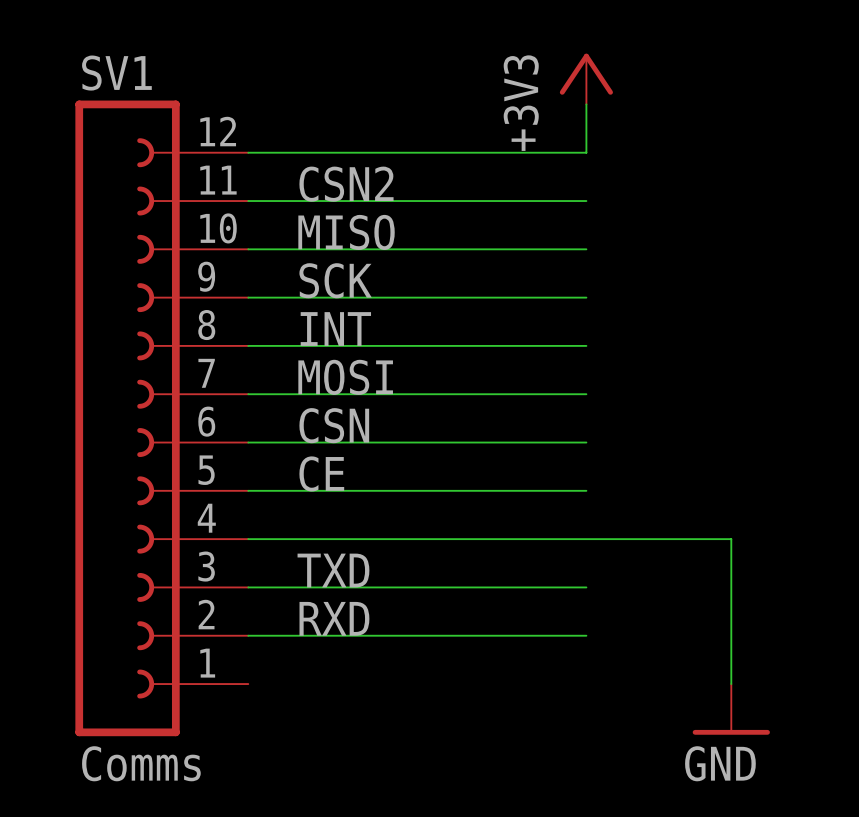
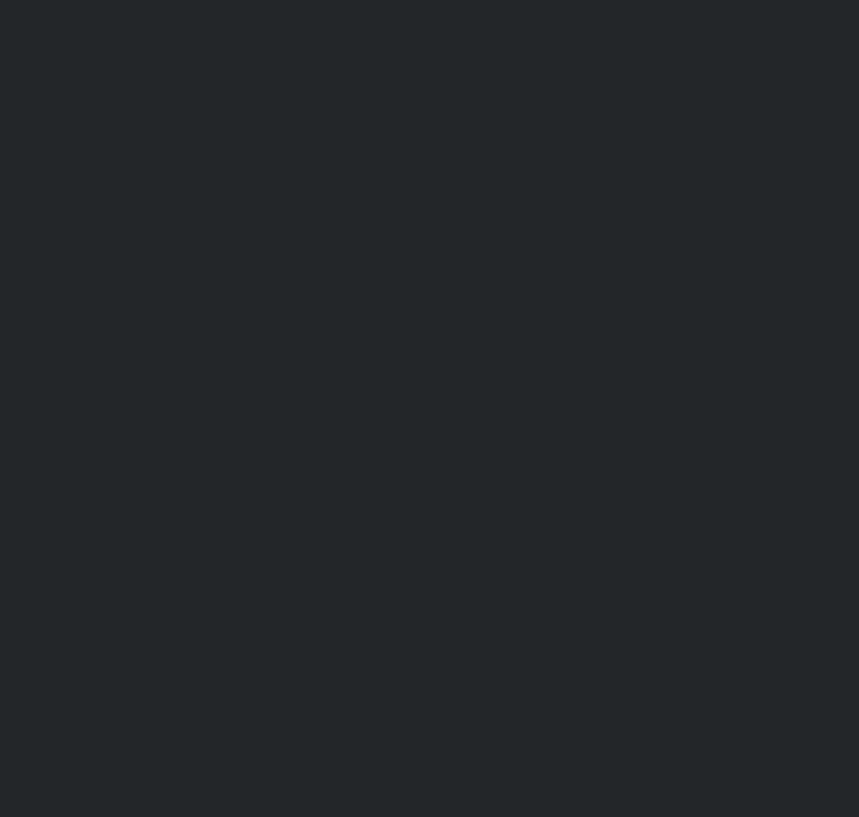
power symbol: +3V3 (586, 79) -> none
wire: (586, 104) (586, 152) (248, 152) -> none
label: CSN2 (346, 184) -> none
wire: (248, 201) (586, 201) -> none
label: MISO (346, 232) -> none
wire: (248, 249) (586, 249) -> none
label: SCK (335, 280) -> none
wire: (248, 297) (586, 297) -> none
label: INT (335, 329) -> none
wire: (248, 345) (586, 345) -> none
label: MOSI (345, 377) -> none
wire: (248, 394) (586, 394) -> none
SV1: Comms (161, 418) -> none
label: CSN (334, 425) -> none
wire: (248, 442) (586, 442) -> none
label: CE (321, 473) -> none
wire: (248, 490) (586, 490) -> none
wire: (248, 539) (731, 539) (731, 684) -> none
label: TXD (333, 570) -> none
wire: (248, 587) (586, 587) -> none
label: RXD (334, 618) -> none
wire: (248, 635) (586, 635) -> none
power symbol: GND (731, 709) -> none

